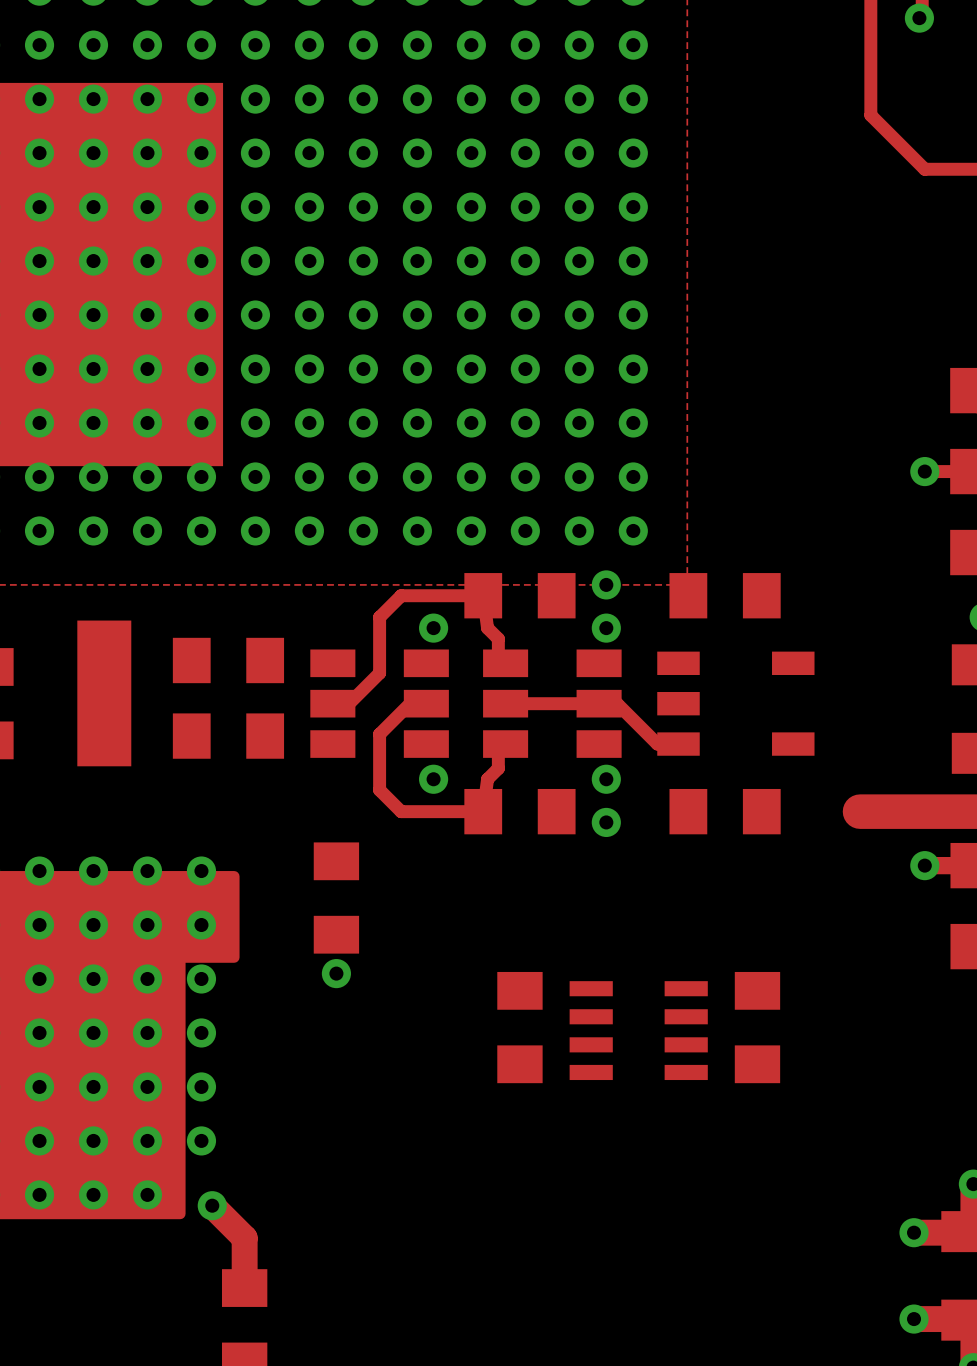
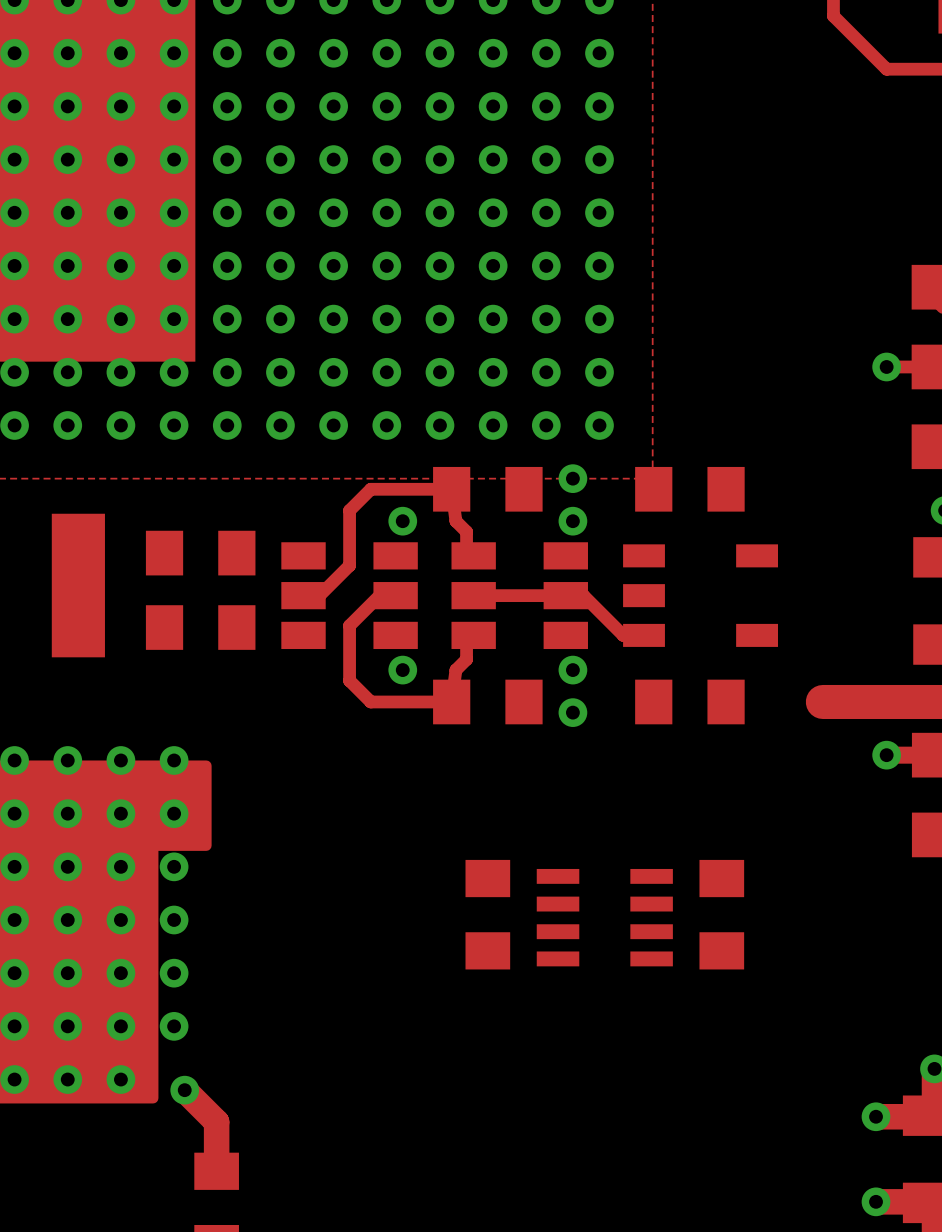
part: (336, 898) -> none
via: (336, 973) -> none

